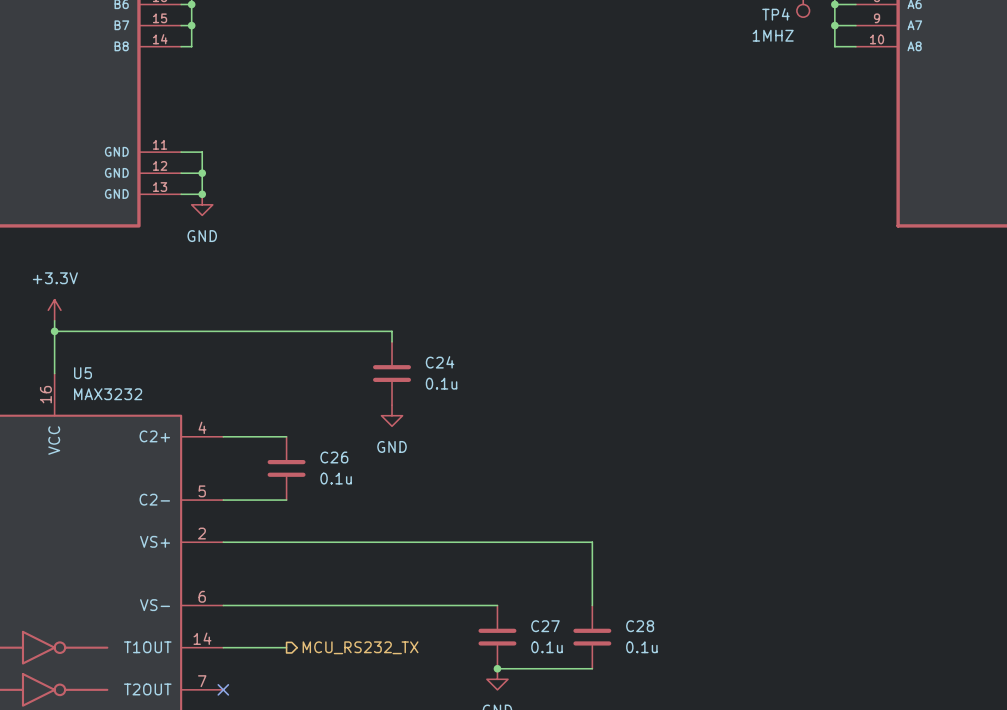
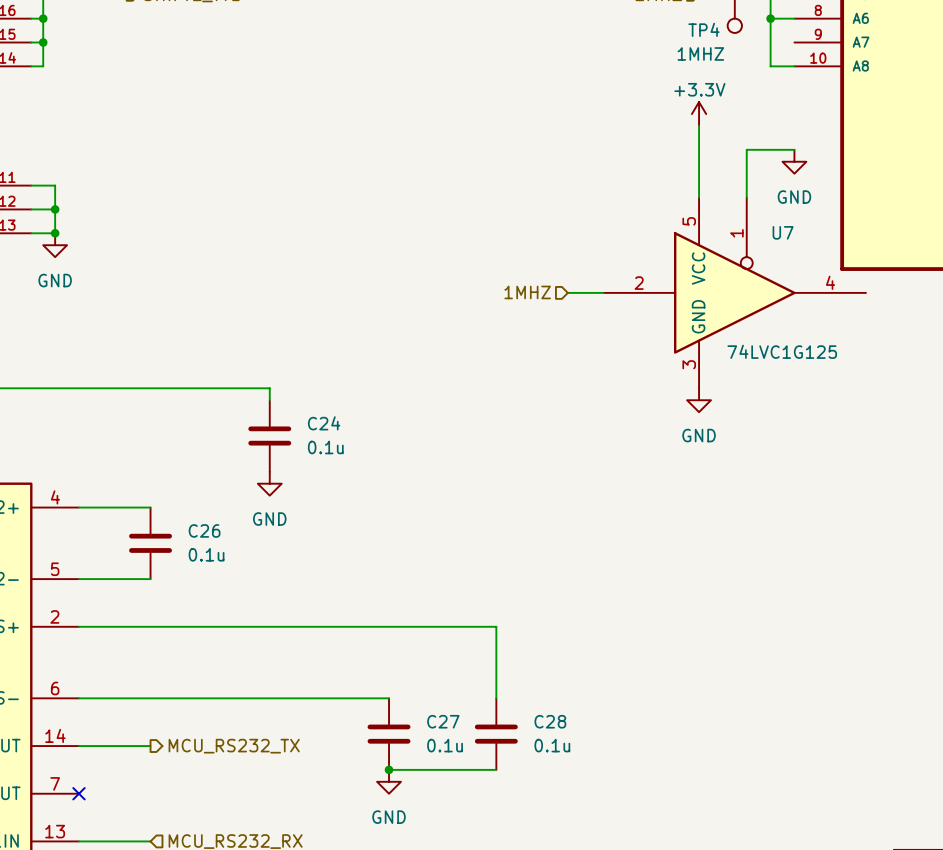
wire: (834, 25) (855, 25) -> none
junction: (834, 25) -> none
power symbol: none -> +3.3V (699, 114)
wire: none -> (699, 125) (699, 197)
wire: none -> (794, 149) (746, 149) (746, 197)
power symbol: none -> GND (794, 161)
hierarchical label: none -> 1MHZ (527, 292)
wire: none -> (567, 292) (603, 292)
U7: none -> 74LVC1G125 (734, 292)
power symbol: none -> GND (699, 400)

